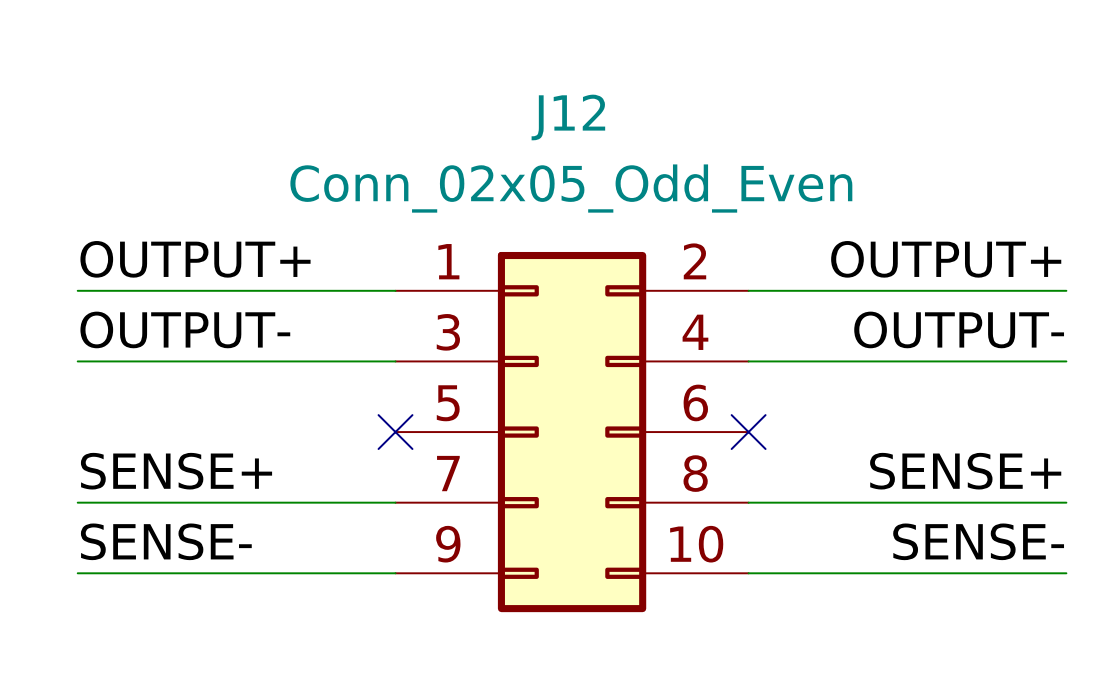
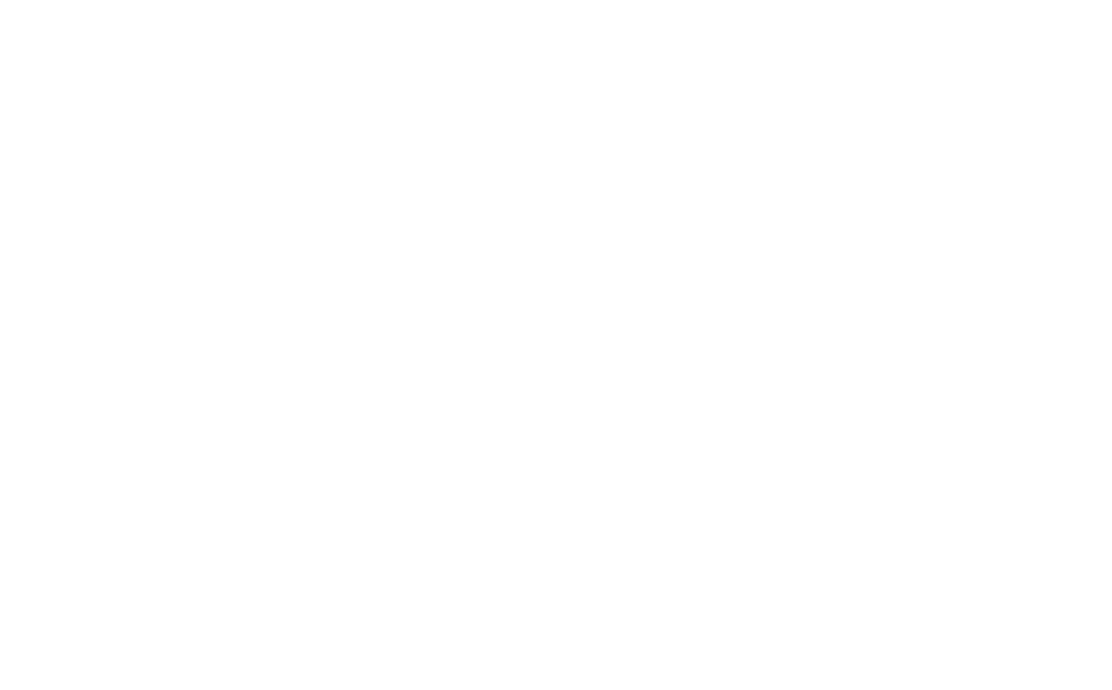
label: OUTPUT+ (195, 259) -> none
label: OUTPUT+ (946, 259) -> none
wire: (77, 290) (395, 290) -> none
wire: (748, 290) (1066, 290) -> none
label: OUTPUT- (185, 329) -> none
label: OUTPUT- (959, 329) -> none
wire: (77, 361) (395, 361) -> none
wire: (748, 361) (1066, 361) -> none
no-connect mark: (395, 432) -> none
J12: Conn_02x05_Odd_Even (572, 432) -> none
no-connect mark: (748, 432) -> none
label: SENSE+ (176, 471) -> none
label: SENSE+ (965, 471) -> none
wire: (77, 502) (395, 502) -> none
wire: (748, 502) (1066, 502) -> none
label: SENSE- (166, 541) -> none
label: SENSE- (978, 541) -> none
wire: (77, 573) (395, 573) -> none
wire: (748, 573) (1066, 573) -> none

